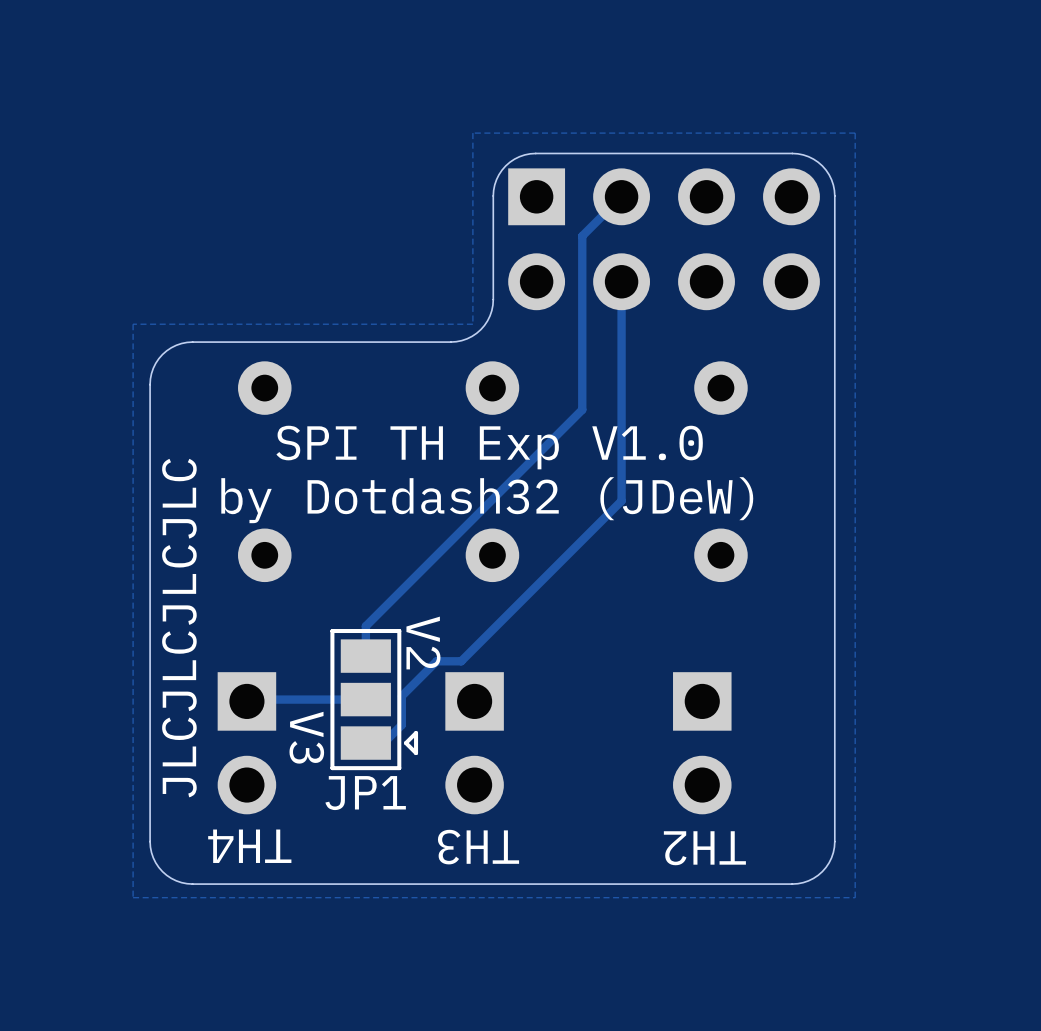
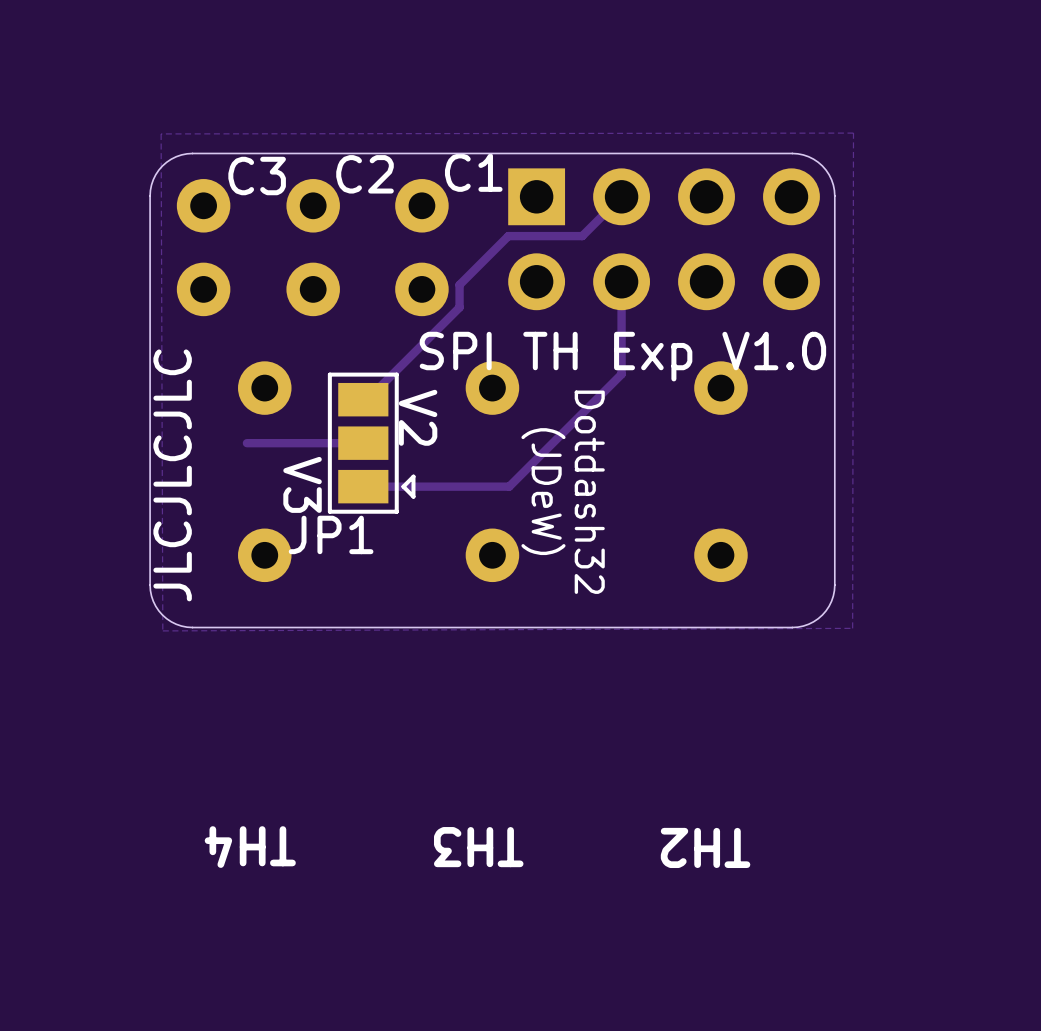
zone outline: (855, 133) (855, 897) (133, 897) (133, 324) (472, 324) (472, 133) (855, 133) -> (853, 133) (852, 628) (162, 630) (161, 133) (853, 133)
board edge: (535, 153) (514, 159) (505, 165) (496, 179) (493, 195) (492, 305) (484, 325) (472, 336) (450, 342) (187, 342) (171, 347) (162, 354) (153, 368) (150, 384) -> (535, 153) (192, 153) (171, 159) (155, 174) (150, 190) (150, 384)
track: (582, 236) (582, 409) (365, 626) (365, 656) -> (582, 236) (508, 236) (459, 284) (459, 307) (367, 399) (363, 399)
C3: none -> (203, 247)
C2: none -> (313, 247)
C1: none -> (421, 247)
track: (621, 374) (621, 500) (461, 661) (436, 661) (401, 696) (401, 724) (383, 743) (365, 743) -> (621, 374) (509, 486) (363, 486)
track: none -> (363, 443) (246, 443)
text position: SPI TH Exp V1.0 (489, 447) -> SPI TH Exp V1.0 (622, 356)
text: none -> (JDeW) (543, 491)
text: by Dotdash32 (JDeW) (487, 500) -> Dotdash32 (589, 492)
board edge: (834, 585) (834, 847) (829, 862) (818, 875) (803, 882) (792, 884) (192, 884) (176, 880) (158, 867) (150, 847) (150, 585) -> (834, 585) (831, 601) (822, 615) (808, 624) (792, 627) (187, 627) (171, 621) (162, 615) (153, 601) (150, 585)
text: JLCJLCJLCJLC (179, 628) -> JLCJLCJLC (172, 475)
text position: V2 (423, 643) -> V2 (418, 417)
track: (365, 699) (248, 699) (246, 701) -> none
JP1 position: (374, 699) -> (371, 443)
text position: V3 (306, 737) -> V3 (302, 484)
part: (246, 743) -> none
part: (474, 743) -> none
part: (702, 743) -> none
JP1 name position: JP1 (365, 793) -> JP1 (331, 534)

